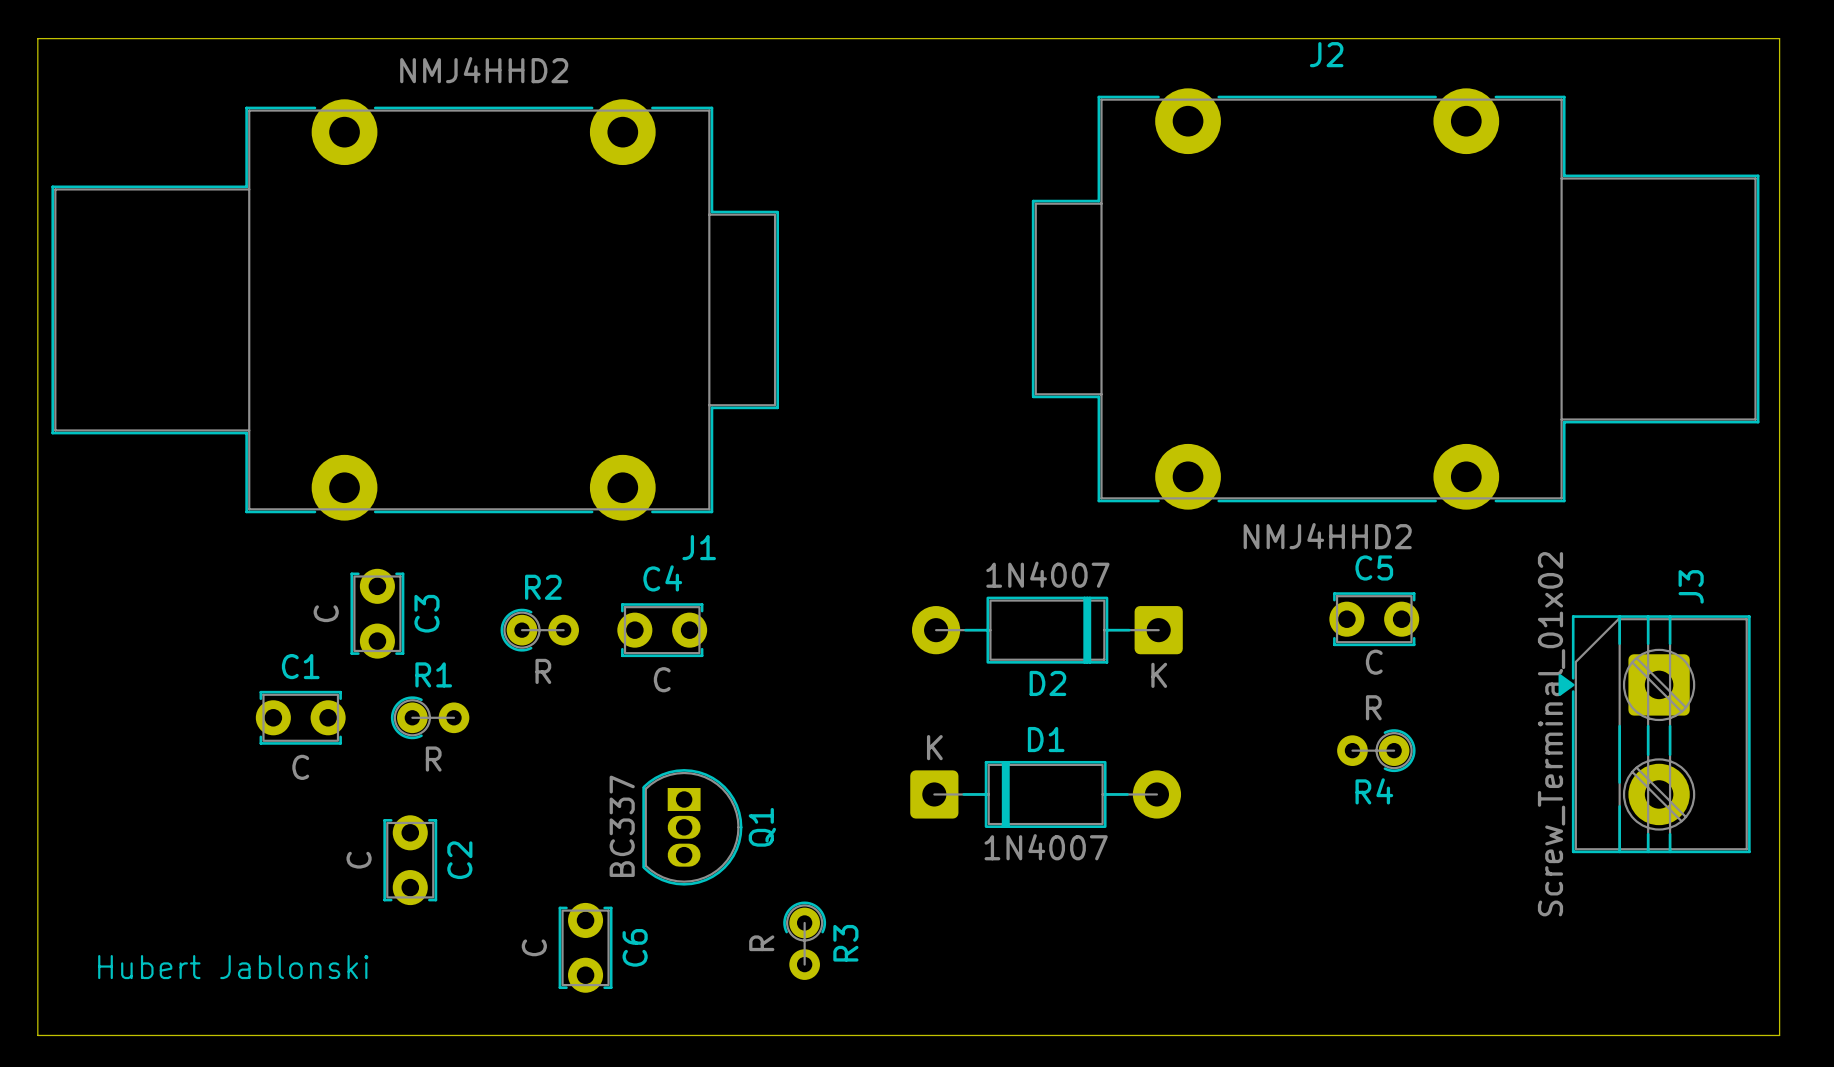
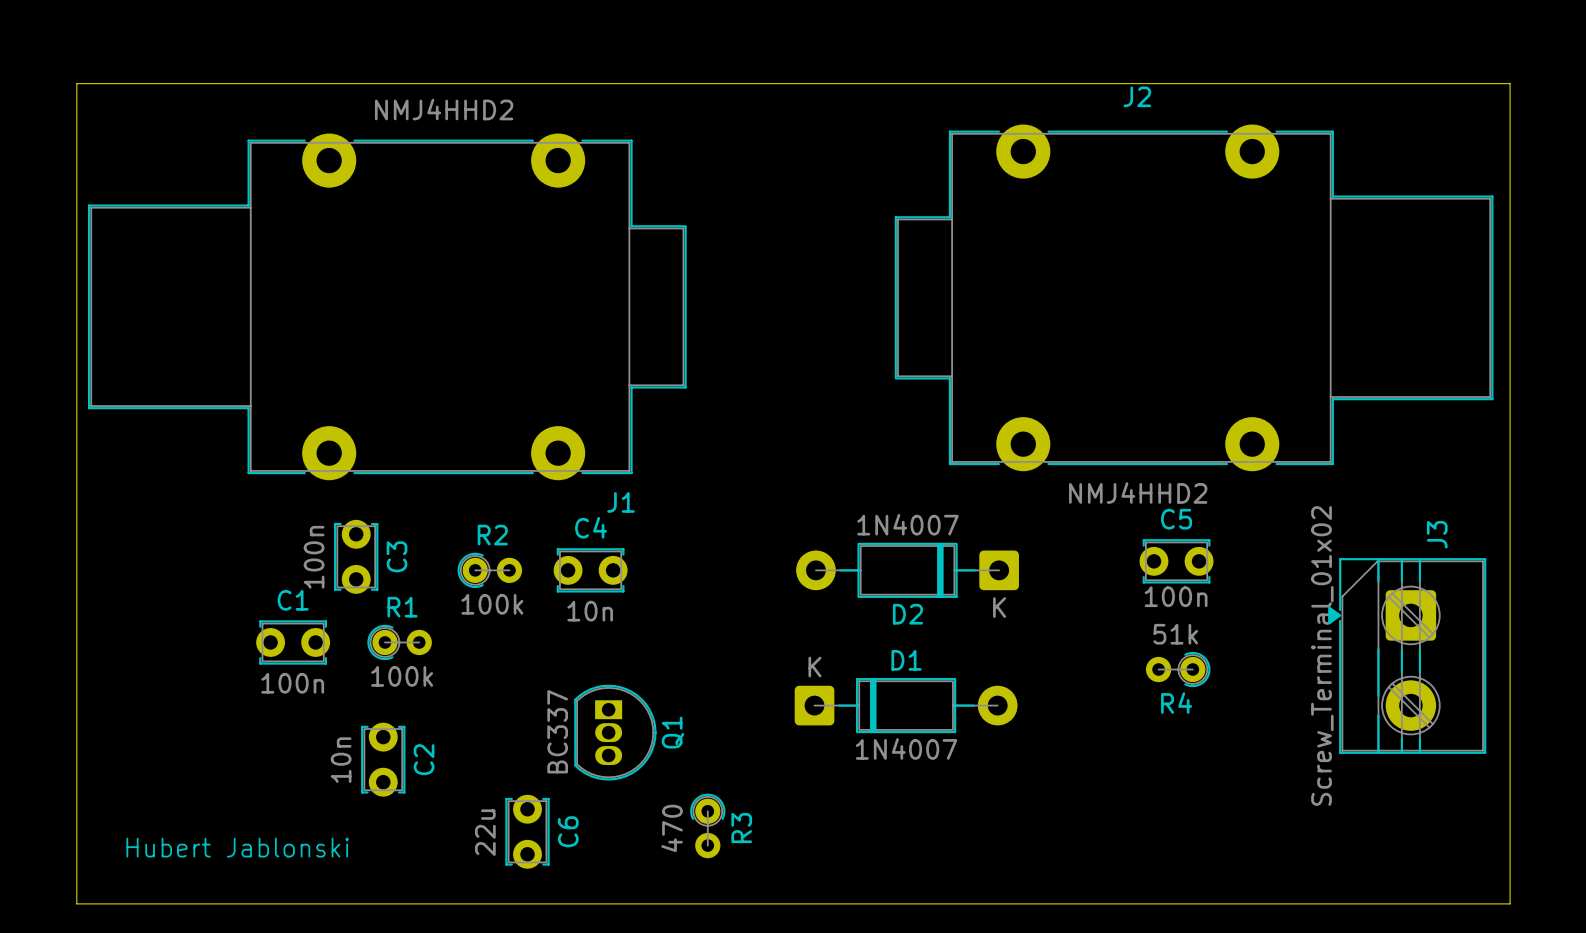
C3 value: C (326, 613) -> 100n (314, 557)
C5 value: C (1374, 662) -> 100n (1176, 596)
R2 value: R (543, 671) -> 100k (492, 604)
C4 value: C (662, 679) -> 10n (590, 611)
R4 value: R (1373, 707) -> 51k (1175, 634)
R1 value: R (433, 759) -> 100k (402, 676)
C1 value: C (300, 767) -> 100n (292, 683)
C2 value: C (359, 860) -> 10n (341, 760)
R3 value: R (761, 943) -> 470 (672, 828)
C6 value: C (534, 947) -> 22u (485, 832)

